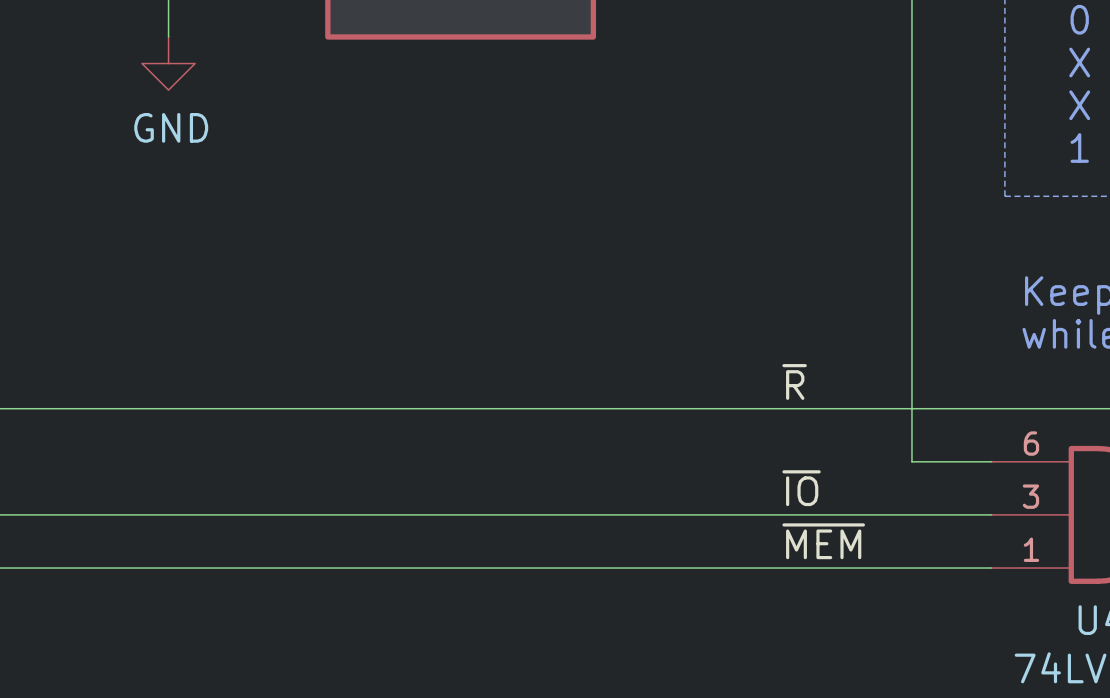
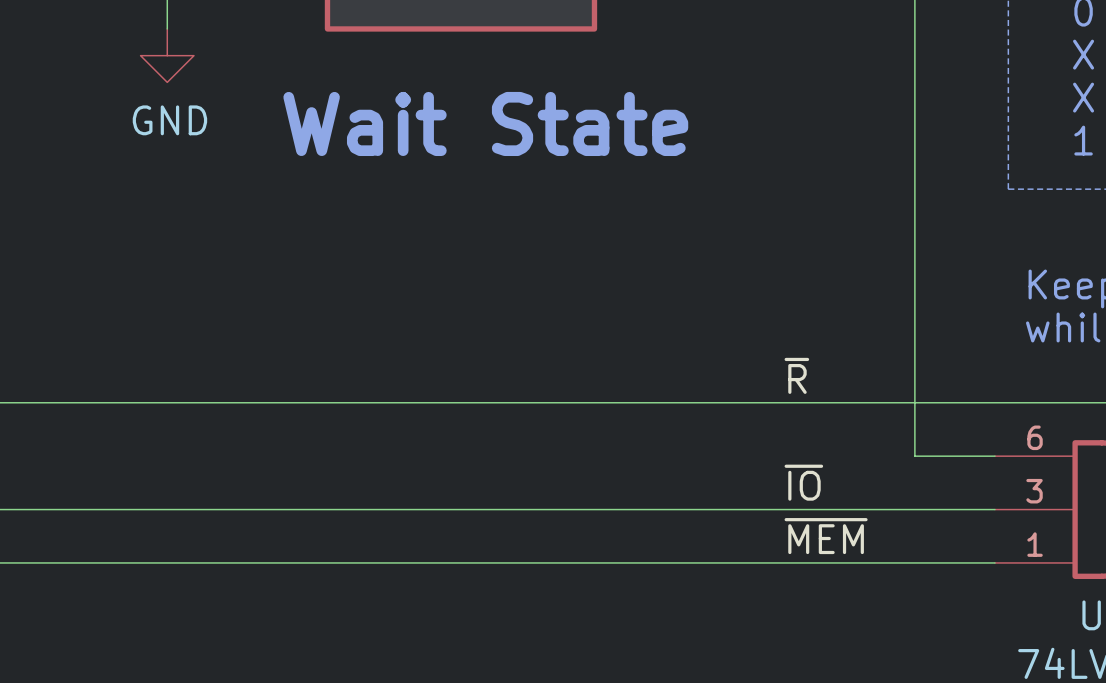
text: none -> Wait State (485, 123)

